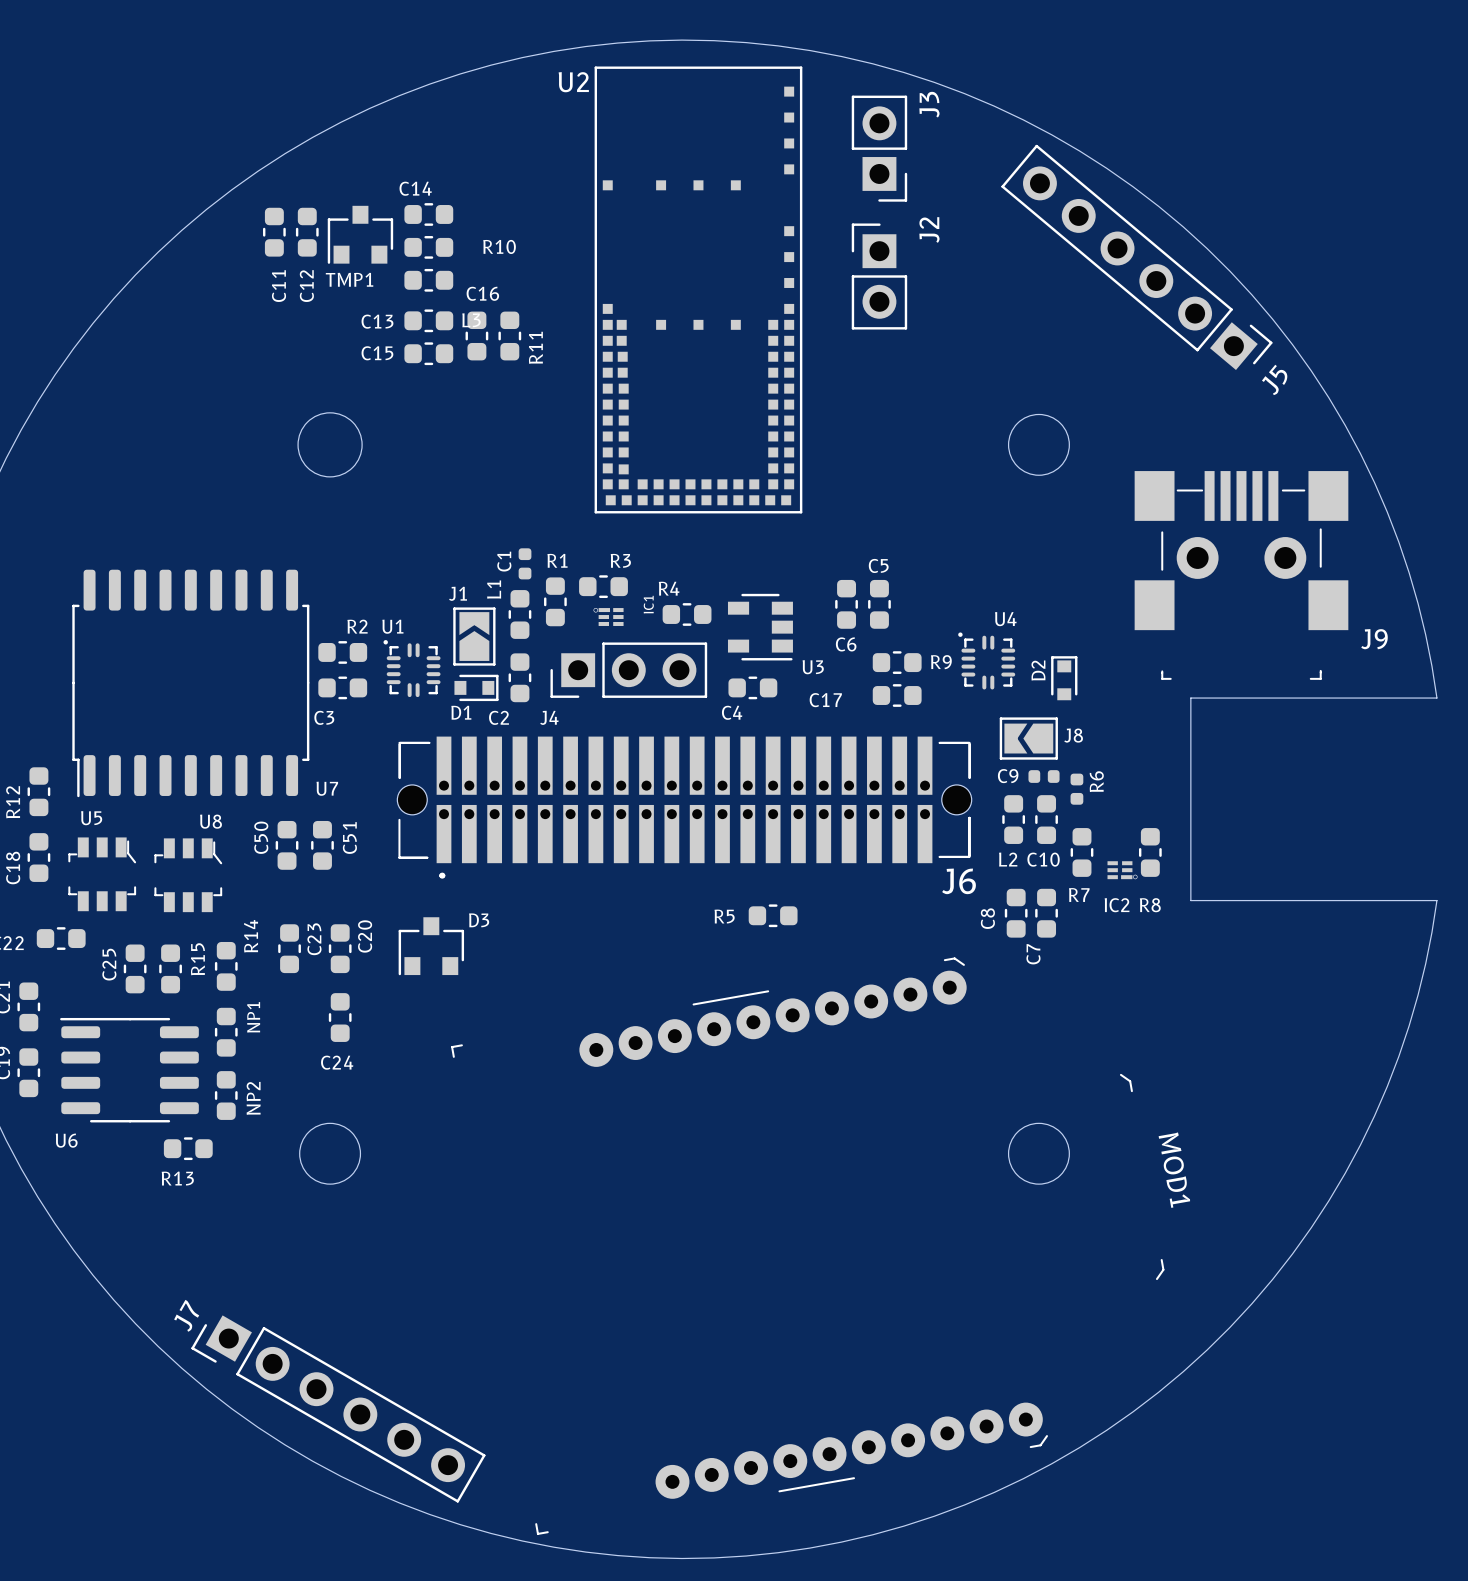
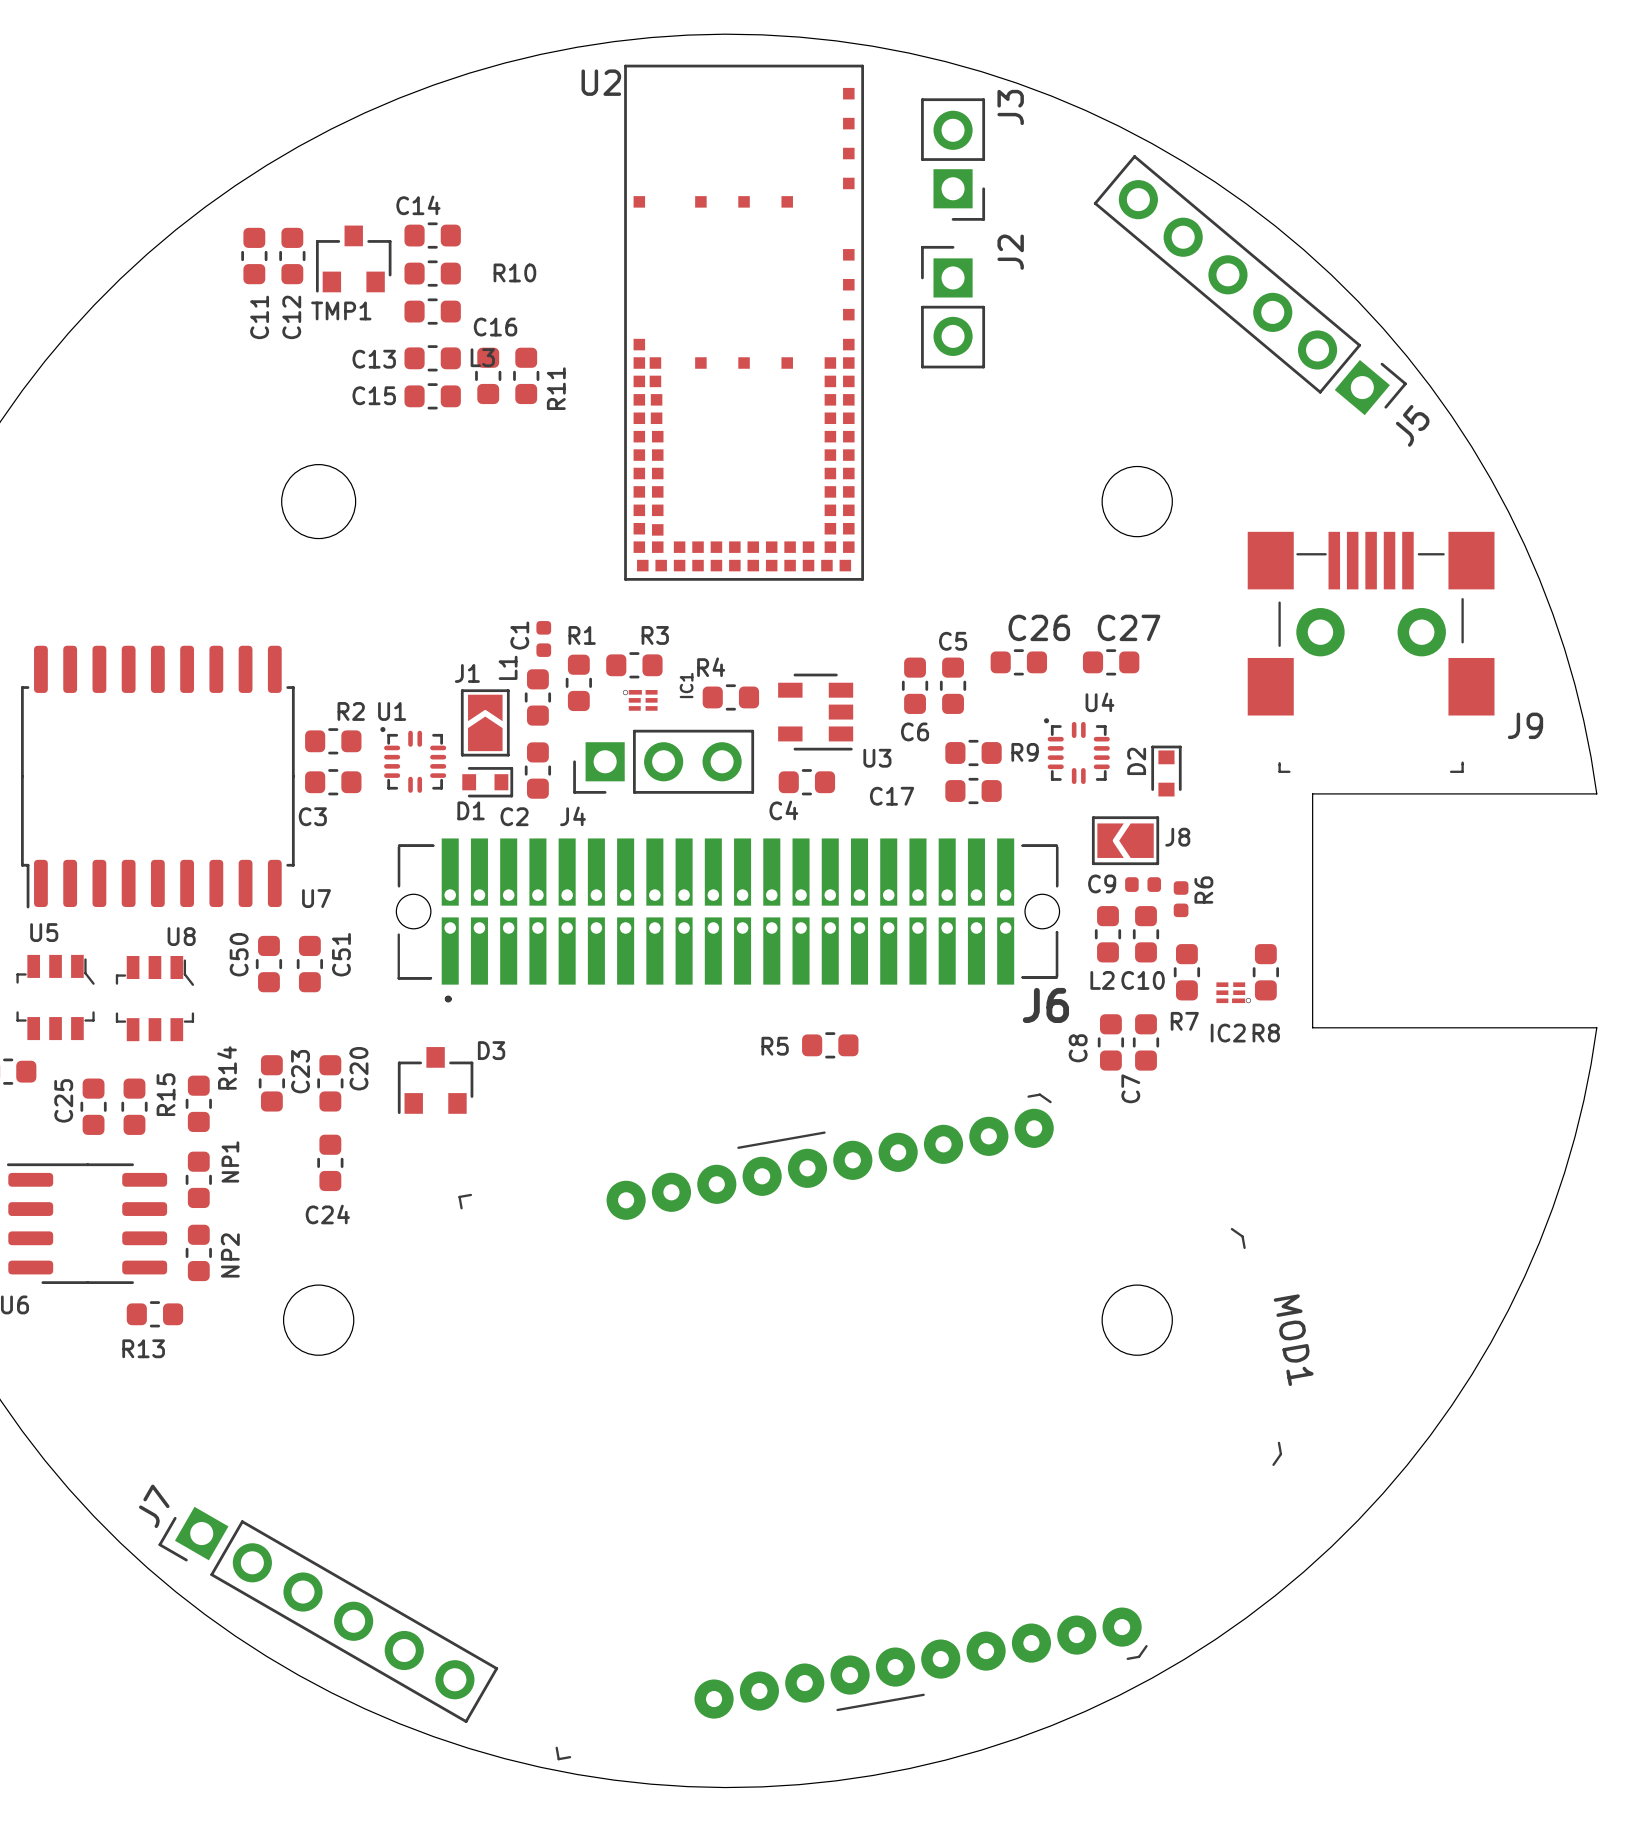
C26: none -> (1018, 662)
C27: none -> (1111, 662)

